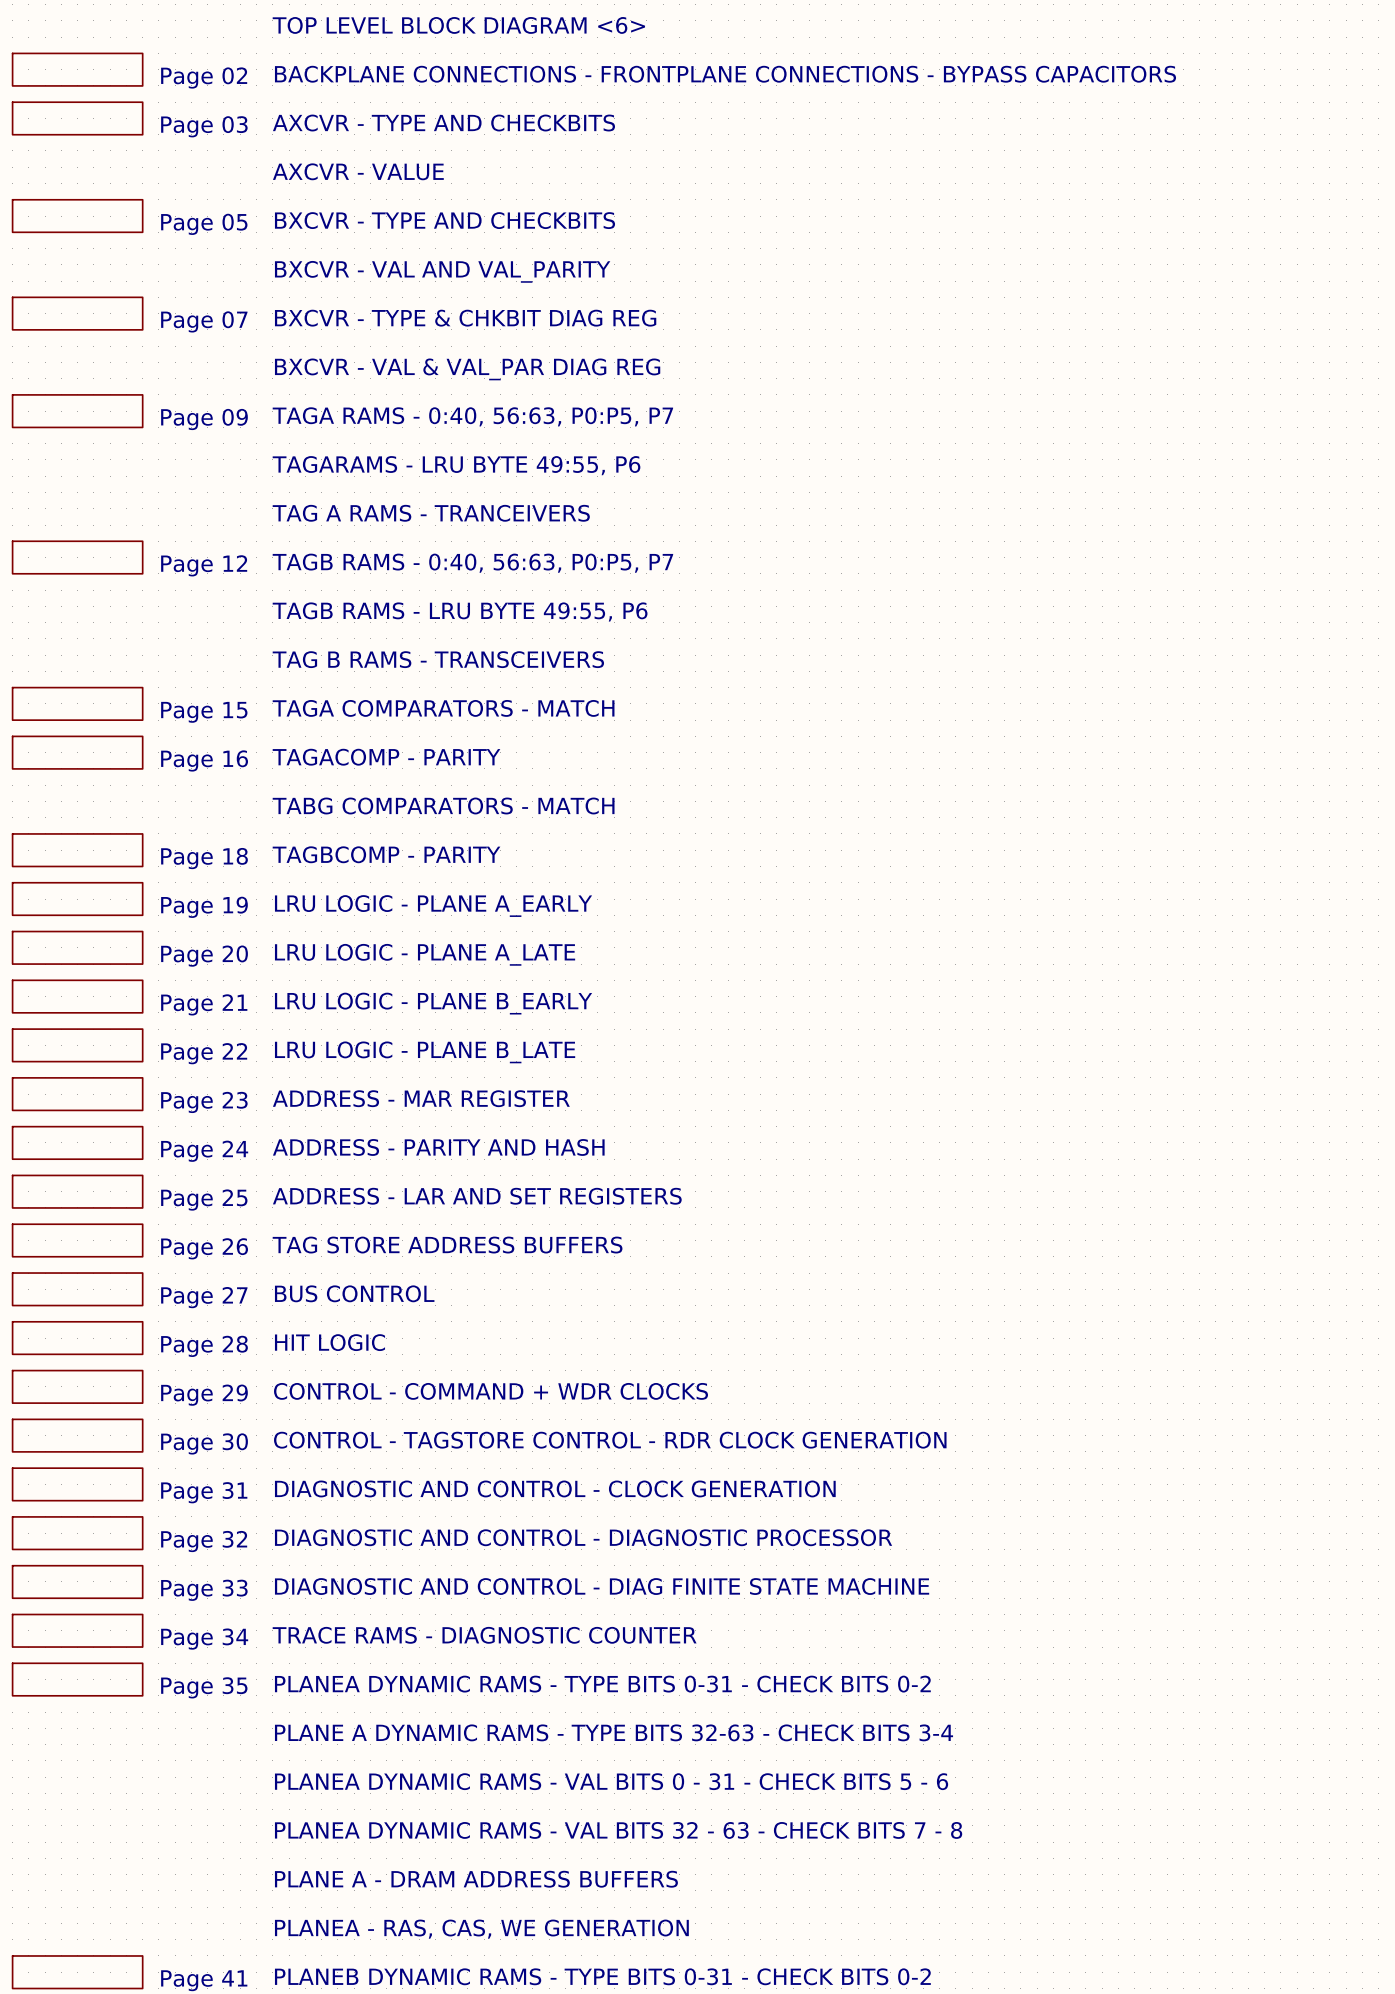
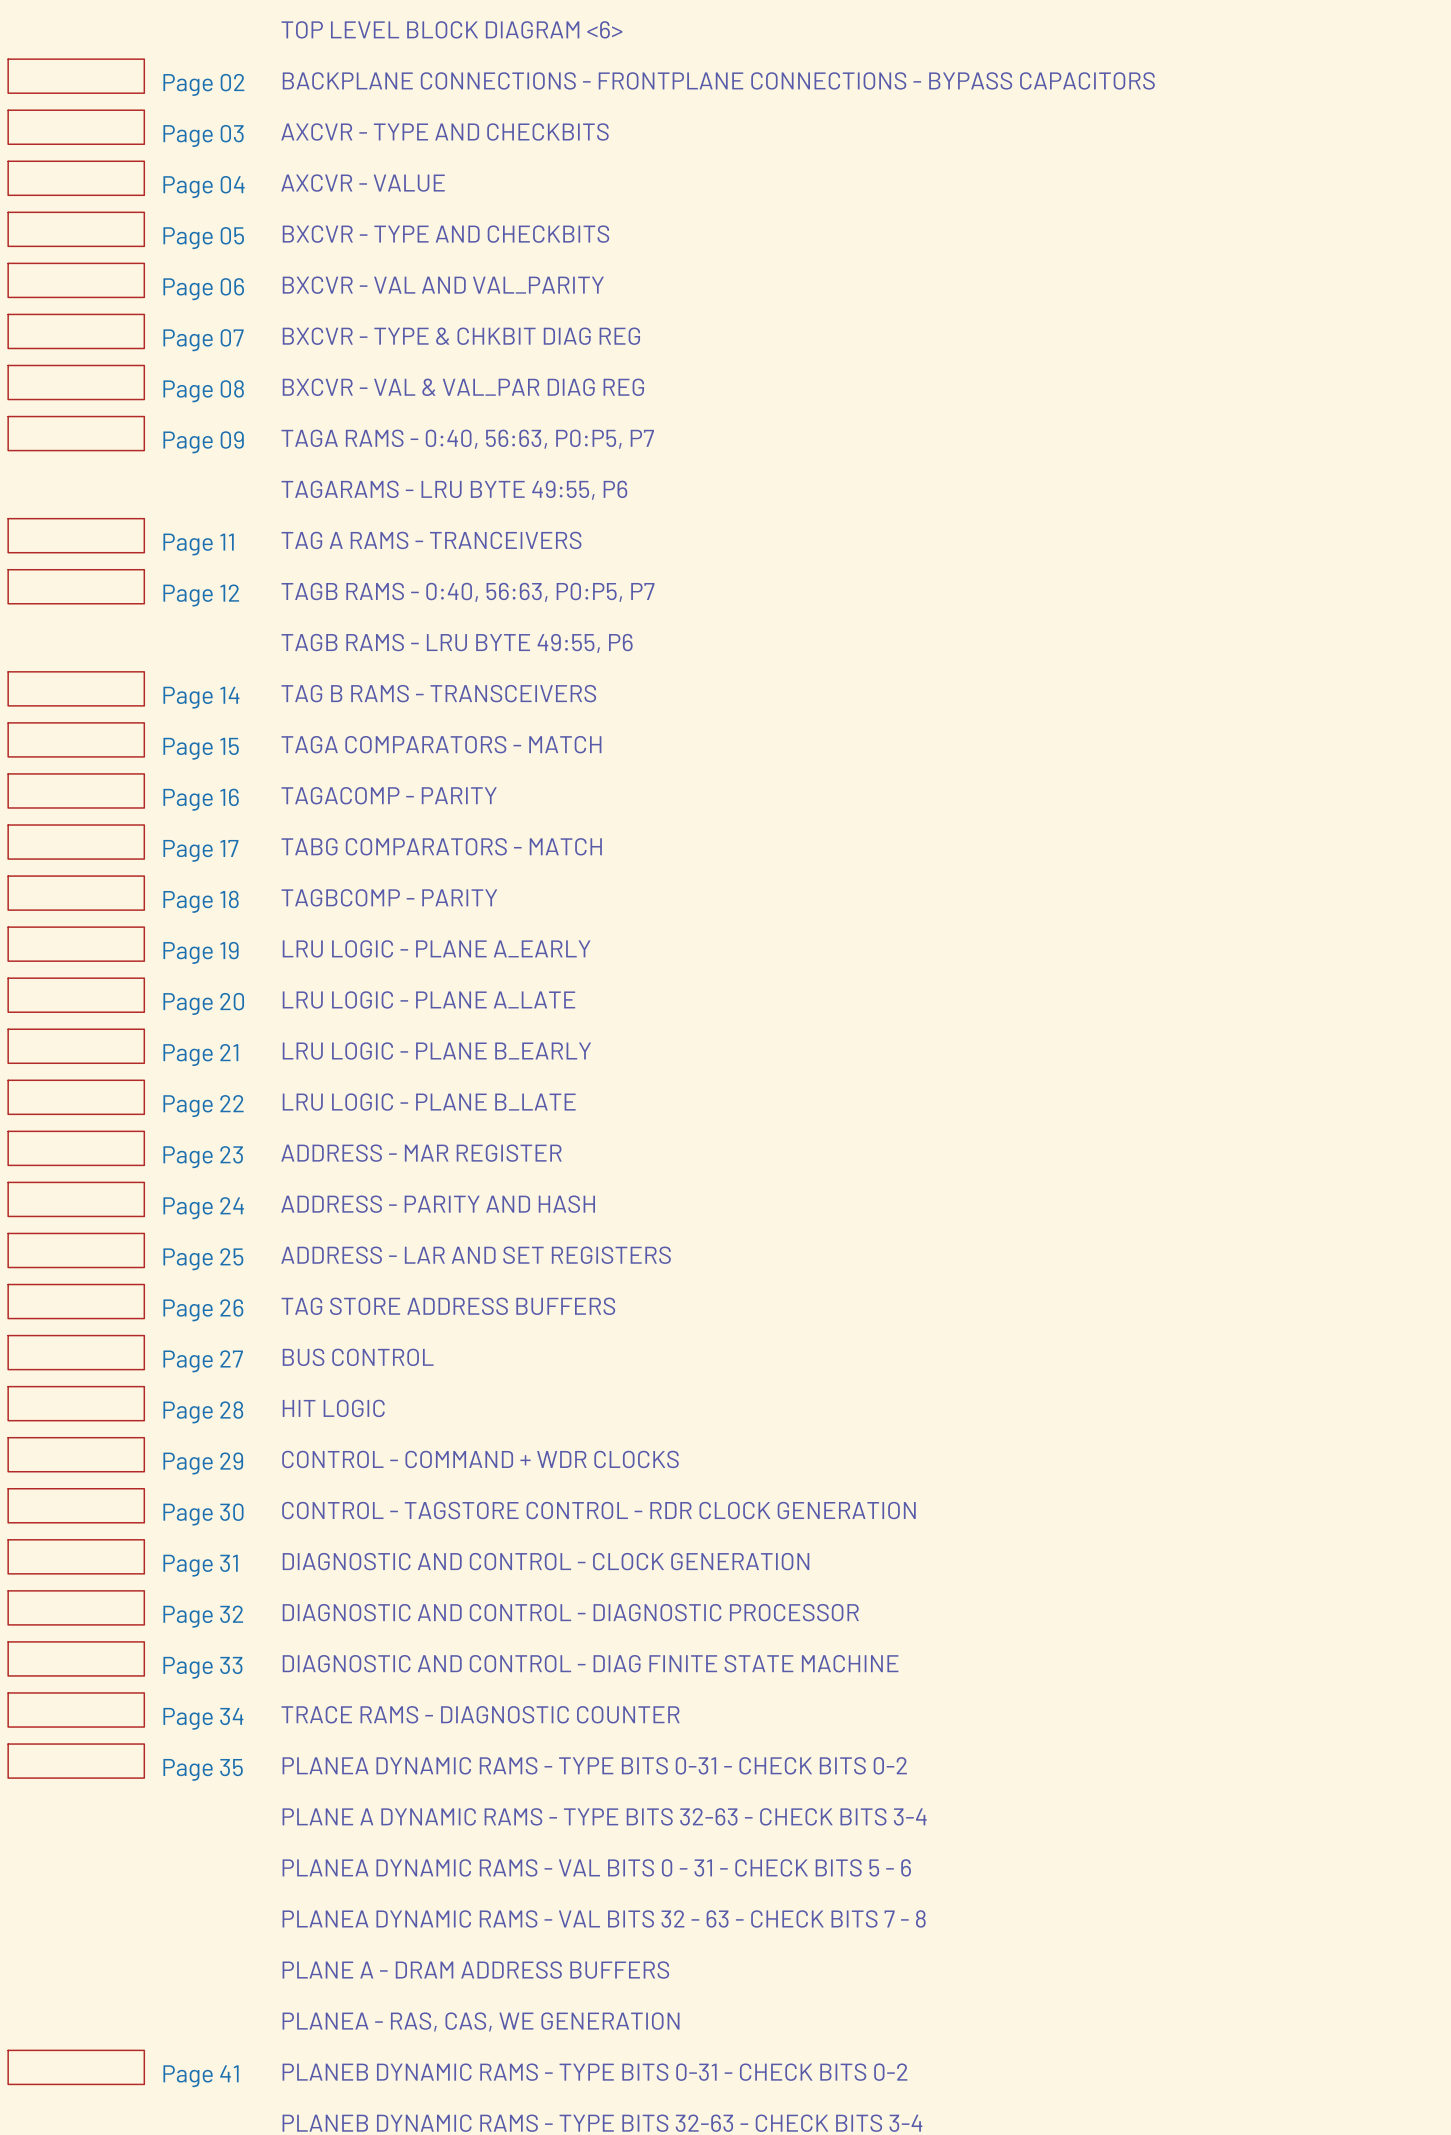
sheet Page 04: none -> (76, 178)
sheet Page 06: none -> (76, 280)
sheet Page 08: none -> (76, 382)
sheet Page 11: none -> (76, 535)
sheet Page 14: none -> (76, 688)
sheet Page 17: none -> (76, 842)

